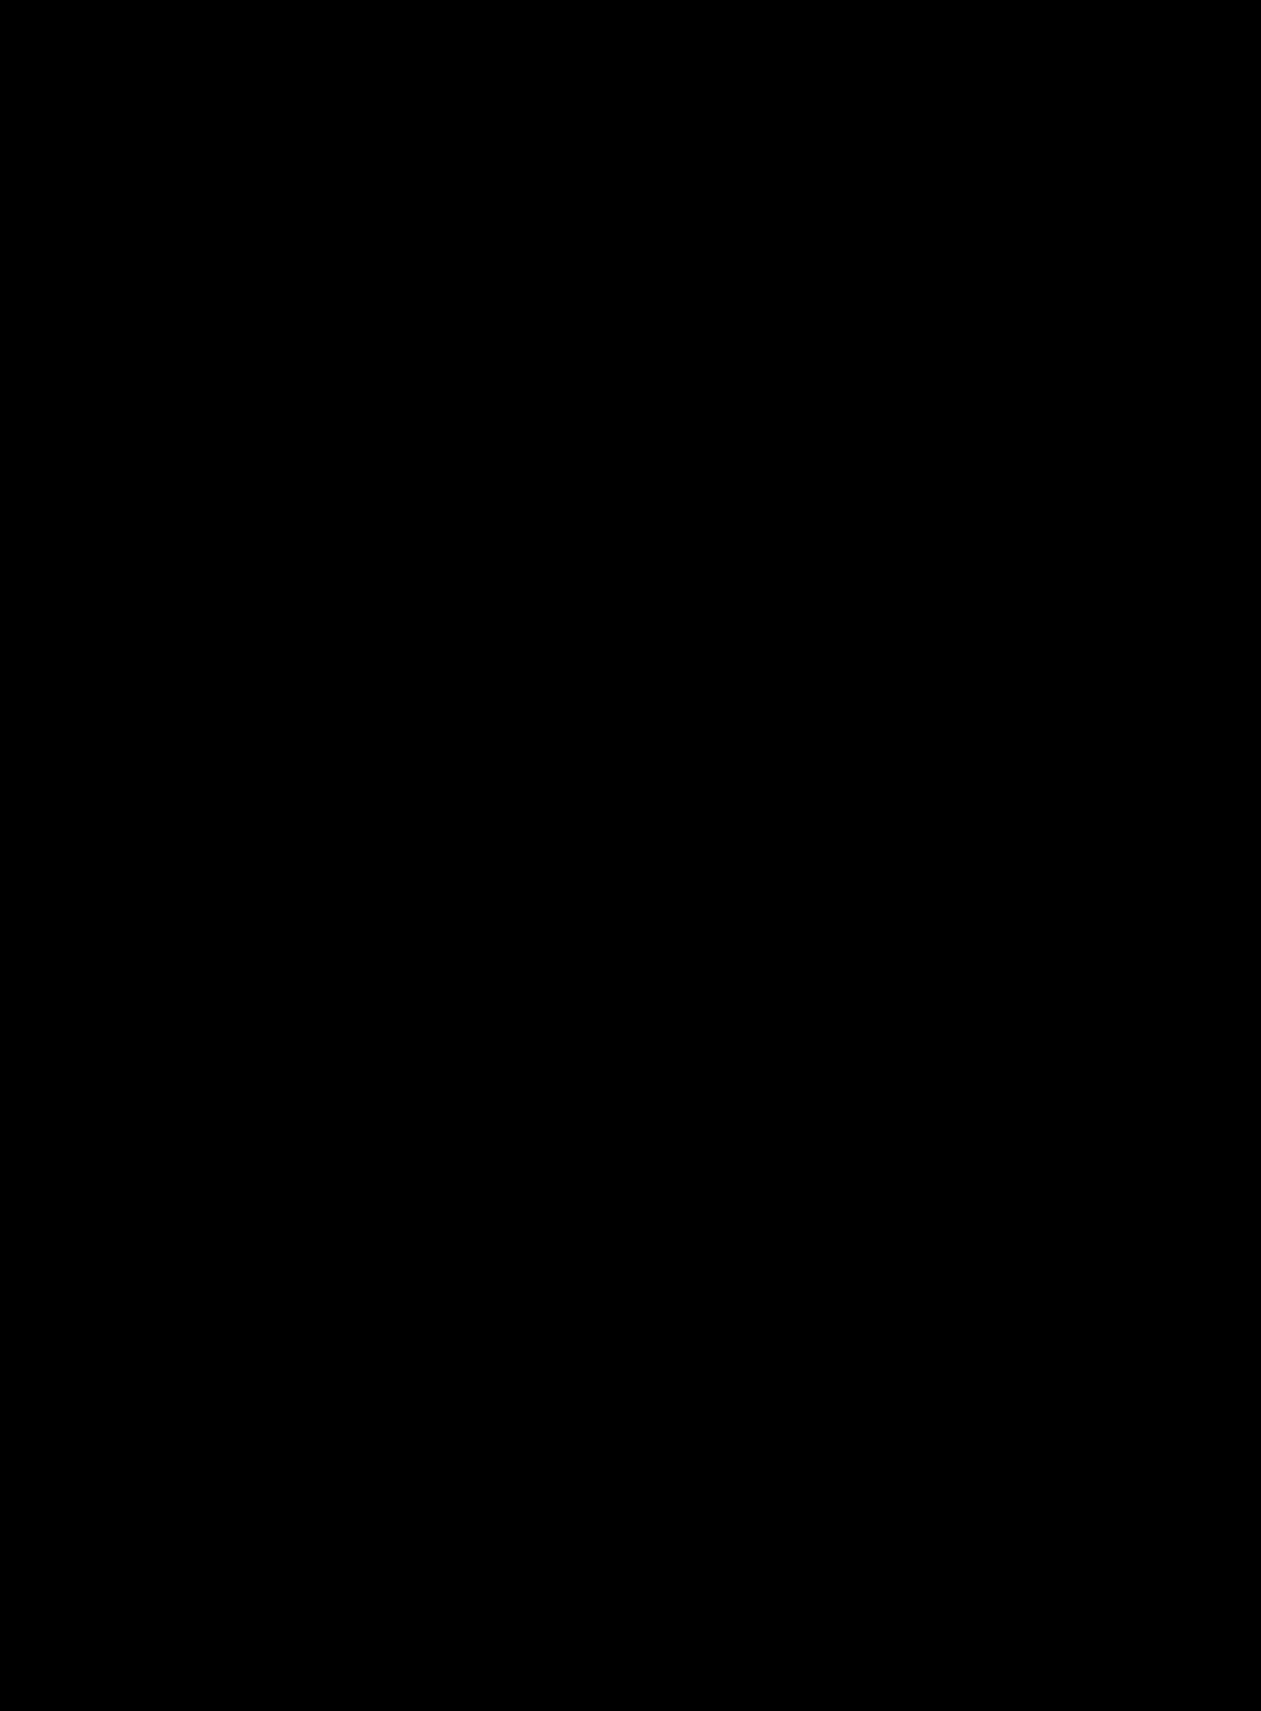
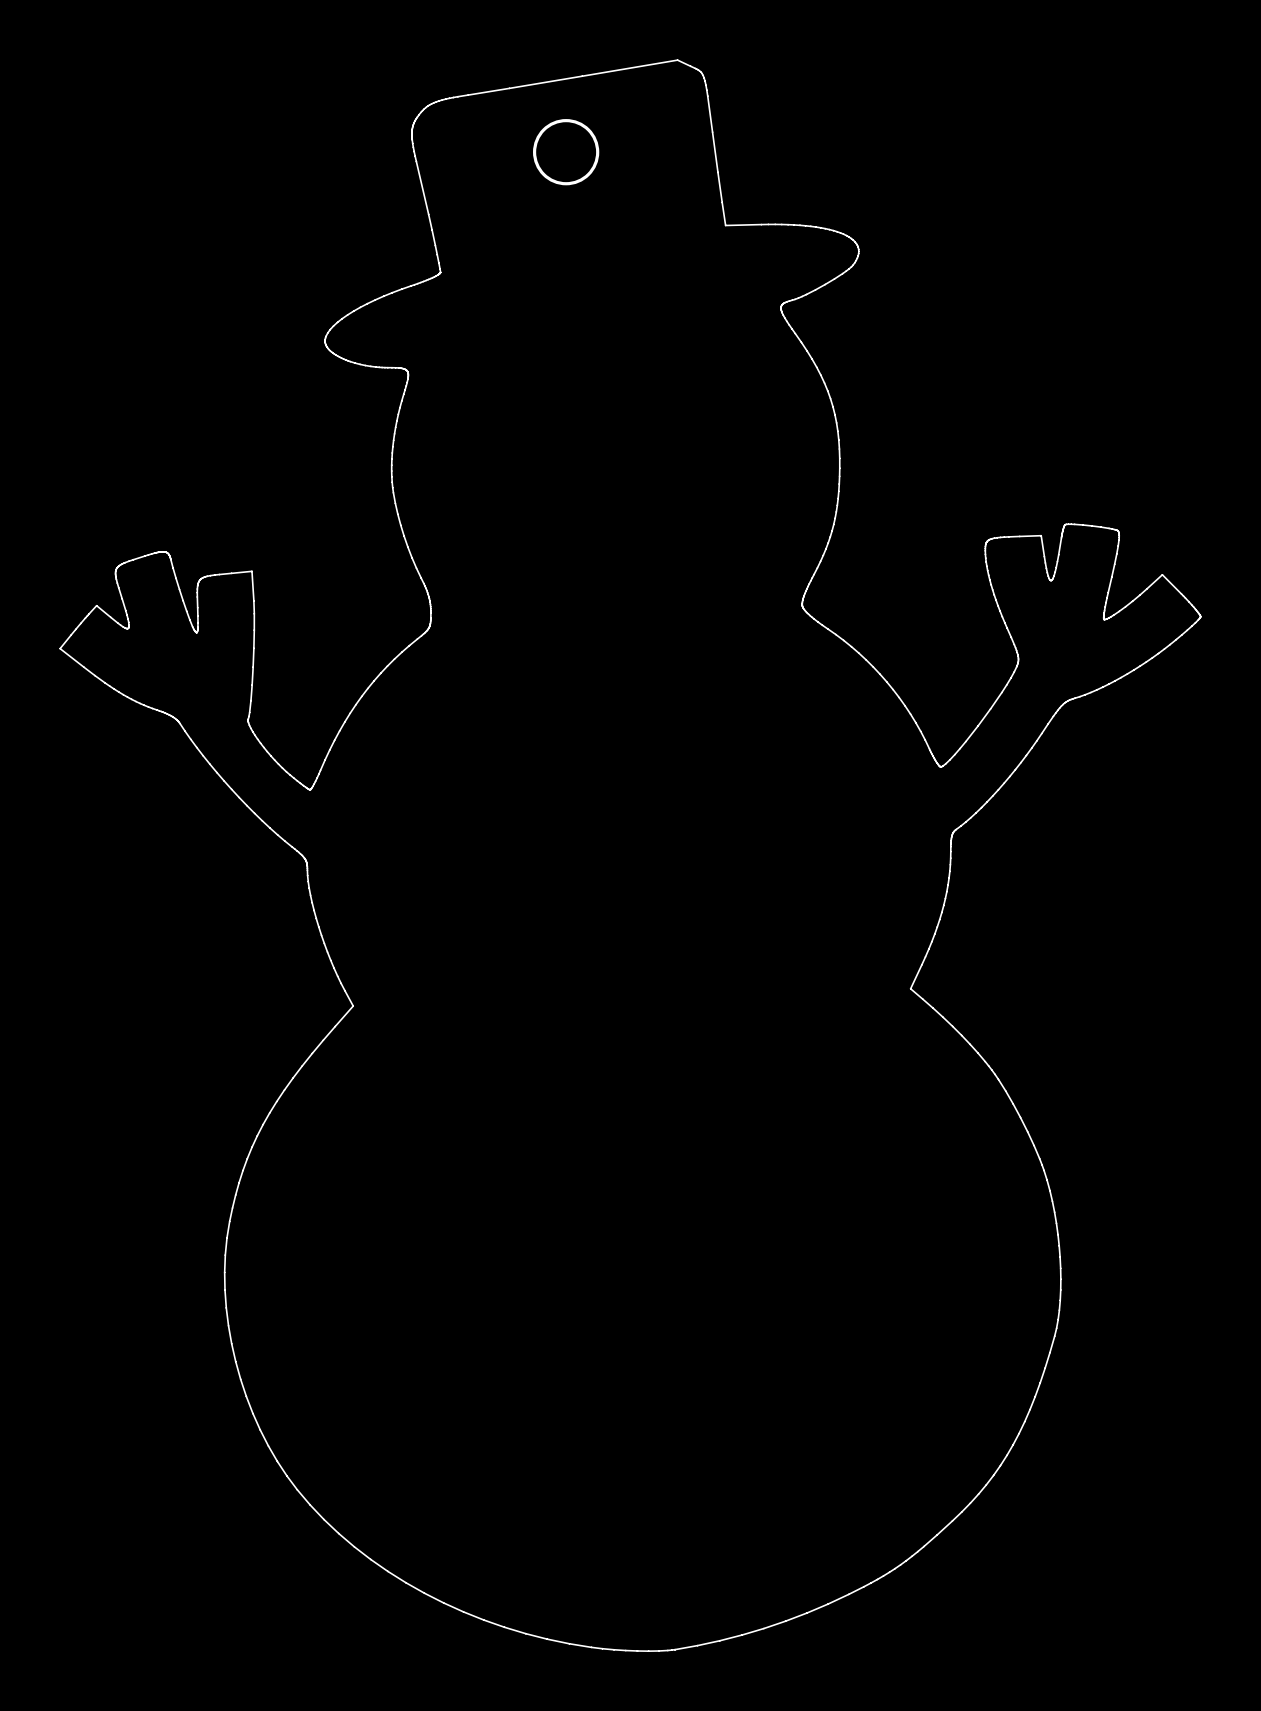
round board edge: none -> [532, 119, 600, 186]
board edge: none -> (440, 272) (412, 138) (414, 122) (425, 107) (436, 101) (453, 97) (677, 60) (700, 71) (706, 90) (725, 225) (781, 224) (820, 227) (846, 235) (855, 241) (858, 247) (857, 258) (849, 268) (815, 289) (784, 303) (781, 307) (784, 318) (812, 359) (824, 383) (832, 406) (838, 440) (839, 484) (835, 518) (828, 542) (805, 591) (802, 605) (811, 617) (858, 653) (886, 681) (910, 714) (940, 766)
board edge: none -> (440, 272) (360, 307) (337, 322) (325, 337) (325, 343) (329, 349) (345, 359) (370, 366) (402, 368) (407, 372) (393, 440) (392, 482) (404, 536) (428, 596) (430, 617) (426, 630) (387, 666) (355, 704) (334, 740) (310, 789)
board edge: none -> (1065, 524) (1091, 525) (1118, 531) (1118, 545) (1103, 619)
board edge: none -> (1064, 525) (1055, 572) (1051, 580) (1047, 572) (1041, 535) (997, 537) (986, 542) (985, 558) (989, 579) (1016, 650) (1018, 662) (1006, 685) (978, 725) (954, 754) (940, 766)
board edge: none -> (1200, 616) (1162, 574) (1125, 606) (1104, 619)
board edge: none -> (1200, 616) (1176, 639) (1140, 666) (1102, 687) (1064, 703) (1004, 783) (976, 812) (954, 831) (951, 840) (948, 884) (941, 912) (928, 949) (910, 988) (961, 1035) (998, 1079) (1034, 1145) (1044, 1170) (1052, 1201) (1060, 1268) (1058, 1319) (1040, 1382) (1013, 1444) (993, 1475) (961, 1512) (912, 1556) (877, 1579) (827, 1604) (763, 1628) (697, 1645) (671, 1650) (648, 1651) (591, 1647) (525, 1633) (463, 1611) (405, 1582) (354, 1546) (310, 1504) (277, 1461) (252, 1413) (235, 1361) (226, 1307) (225, 1255) (235, 1195) (252, 1147) (276, 1101) (312, 1053) (353, 1006) (334, 968) (321, 935) (312, 902) (306, 863) (304, 857) (262, 820) (231, 789) (203, 755) (176, 719) (118, 692) (60, 648) (96, 605) (120, 625) (128, 628) (128, 619) (116, 577) (116, 569) (125, 562) (160, 551) (166, 552) (169, 555) (186, 611) (196, 632)
board edge: none -> (197, 632) (197, 589) (200, 579) (210, 575) (251, 571) (253, 648) (248, 722) (257, 739) (274, 760) (309, 789)

